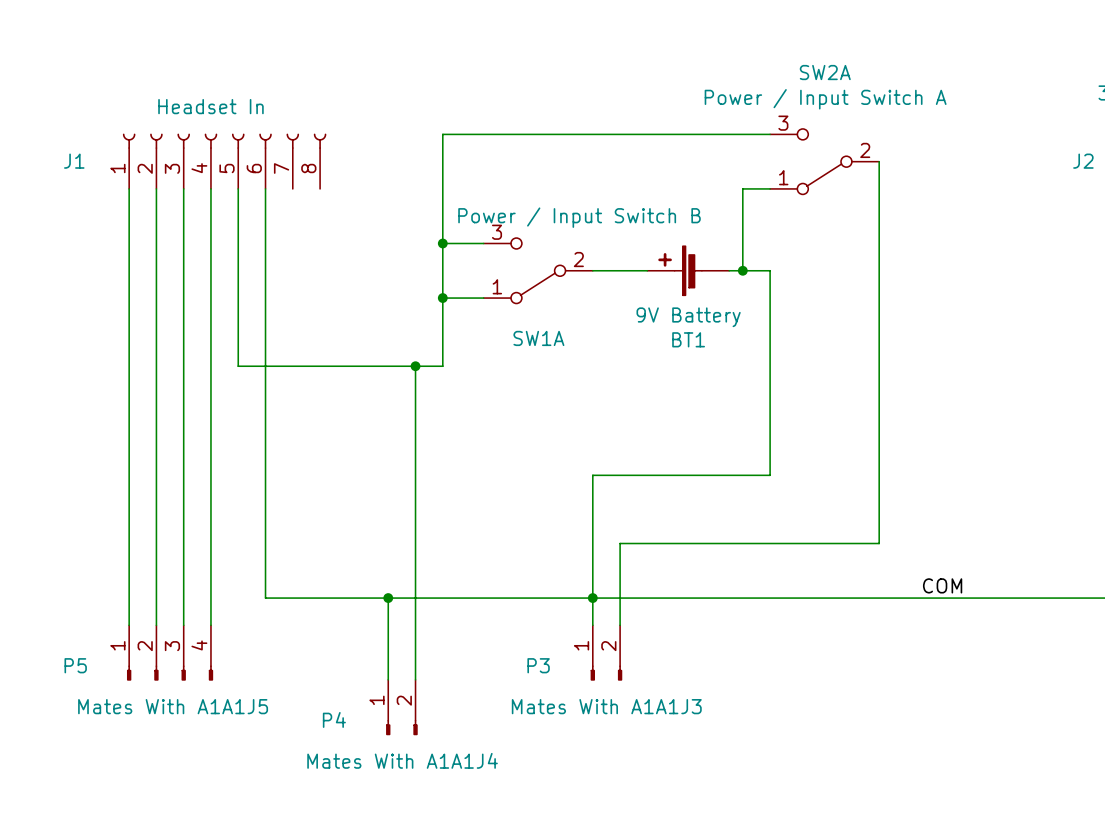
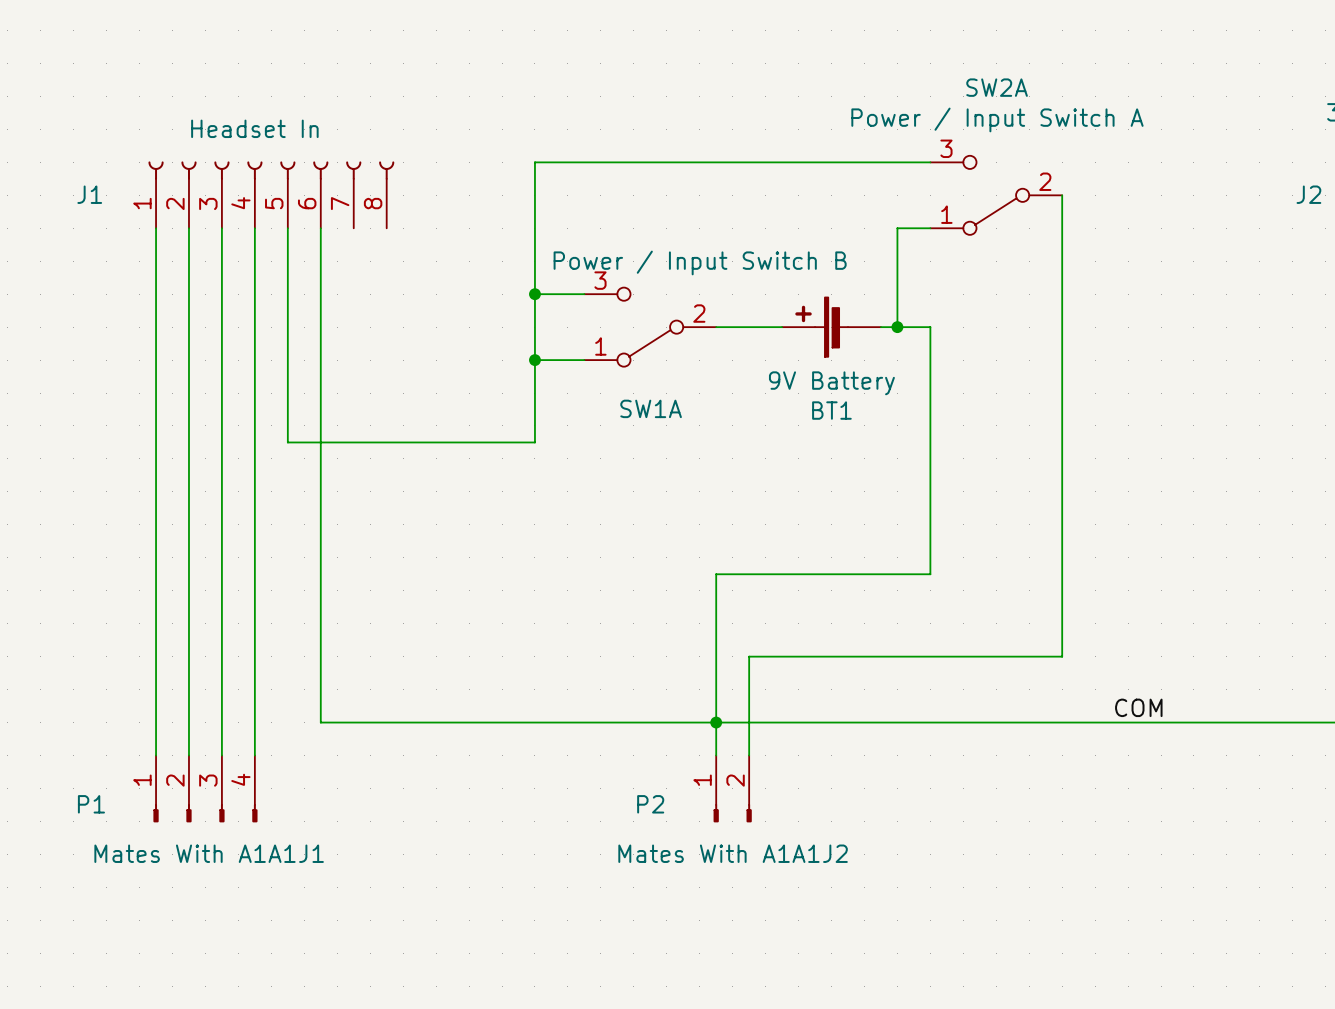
wire: (415, 366) (415, 679) -> none
junction: (415, 366) -> none
wire: (388, 598) (388, 679) -> none
junction: (388, 598) -> none
P5 name: P5 (75, 665) -> P1 (91, 804)
P3 name: P3 (538, 665) -> P2 (650, 804)
P5 value: Mates With A1A1J5 (173, 706) -> Mates With A1A1J1 (209, 853)
P3 value: Mates With A1A1J3 (606, 706) -> Mates With A1A1J2 (733, 853)
P4: Mates With A1A1J4 (401, 707) -> none

